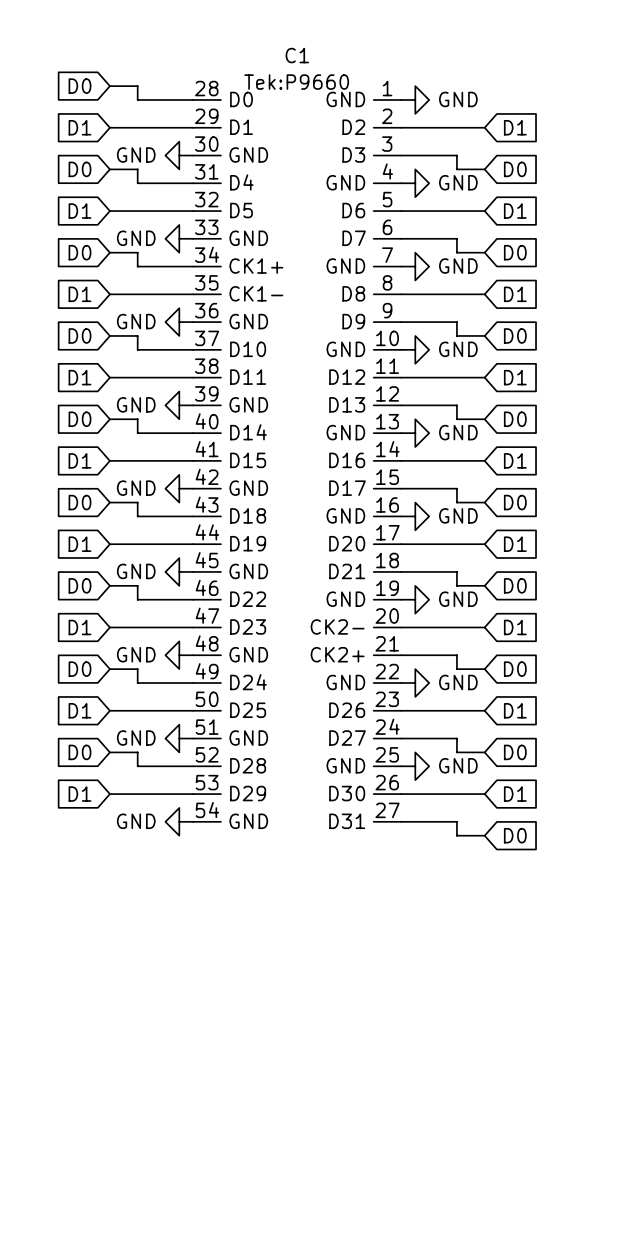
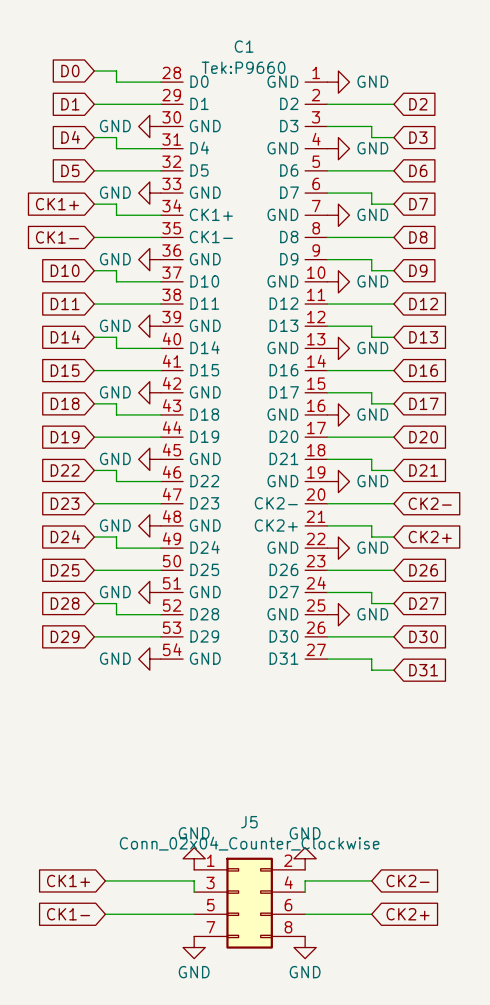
global label: D1 (515, 127) -> D2 (418, 104)
global label: D0 (79, 169) -> D4 (70, 137)
global label: D0 (515, 169) -> D3 (418, 137)
global label: D1 (79, 211) -> D5 (70, 170)
global label: D1 (515, 211) -> D6 (418, 170)
global label: D0 (79, 252) -> CK1+ (57, 204)
global label: D0 (515, 252) -> D7 (418, 204)
global label: D1 (79, 294) -> CK1- (57, 237)
global label: D1 (515, 294) -> D8 (418, 237)
global label: D0 (79, 335) -> D10 (65, 270)
global label: D0 (515, 335) -> D9 (418, 270)
global label: D1 (79, 377) -> D11 (65, 304)
global label: D1 (515, 377) -> D12 (423, 304)
global label: D0 (79, 419) -> D14 (65, 337)
global label: D0 (515, 419) -> D13 (423, 337)
global label: D1 (79, 460) -> D15 (65, 370)
global label: D1 (515, 460) -> D16 (423, 370)
global label: D0 (79, 502) -> D18 (65, 403)
global label: D0 (515, 502) -> D17 (423, 403)
global label: D1 (79, 544) -> D19 (65, 437)
global label: D1 (515, 544) -> D20 (423, 437)
global label: D0 (79, 585) -> D22 (65, 470)
global label: D0 (515, 585) -> D21 (423, 470)
global label: D1 (79, 627) -> D23 (65, 503)
global label: D1 (515, 627) -> CK2- (430, 503)
global label: D0 (79, 669) -> D24 (65, 536)
global label: D0 (515, 669) -> CK2+ (430, 537)
global label: D1 (79, 710) -> D25 (65, 570)
global label: D1 (515, 710) -> D26 (423, 570)
global label: D0 (79, 752) -> D28 (65, 603)
global label: D0 (515, 752) -> D27 (423, 603)
global label: D1 (79, 794) -> D29 (65, 636)
global label: D1 (515, 794) -> D30 (423, 636)
global label: D0 (515, 835) -> D31 (423, 670)
power symbol: none -> GND (194, 858)
power symbol: none -> GND (305, 858)
global label: none -> CK1+ (68, 880)
wire: none -> (105, 880) (194, 880) (194, 892)
wire: none -> (371, 880) (305, 880) (305, 892)
global label: none -> CK2- (408, 880)
J5: none -> Conn_02x04_Counter_Clockwise (249, 903)
global label: none -> CK1- (68, 914)
wire: none -> (105, 914) (194, 914)
wire: none -> (305, 914) (371, 914)
global label: none -> CK2+ (408, 914)
power symbol: none -> GND (194, 947)
power symbol: none -> GND (305, 947)

